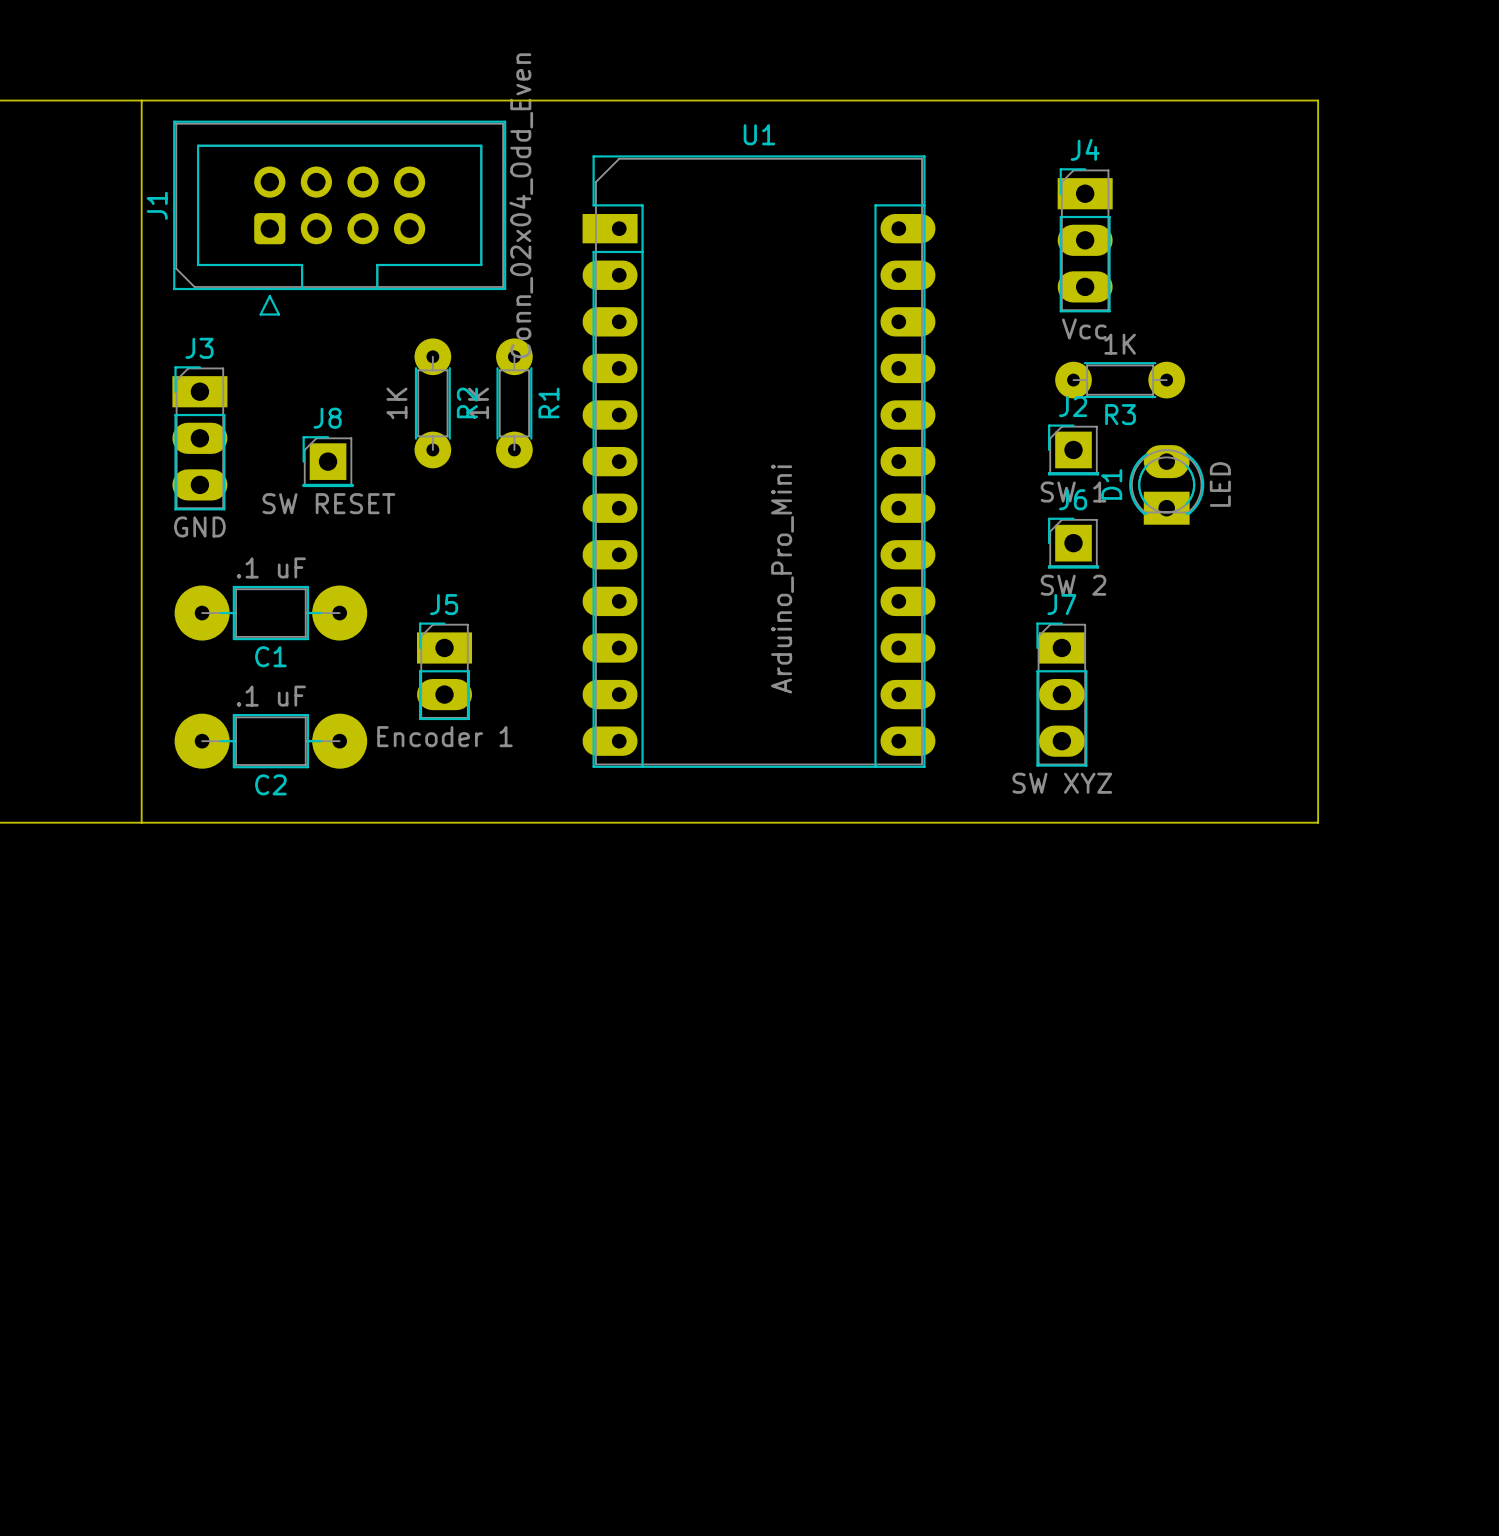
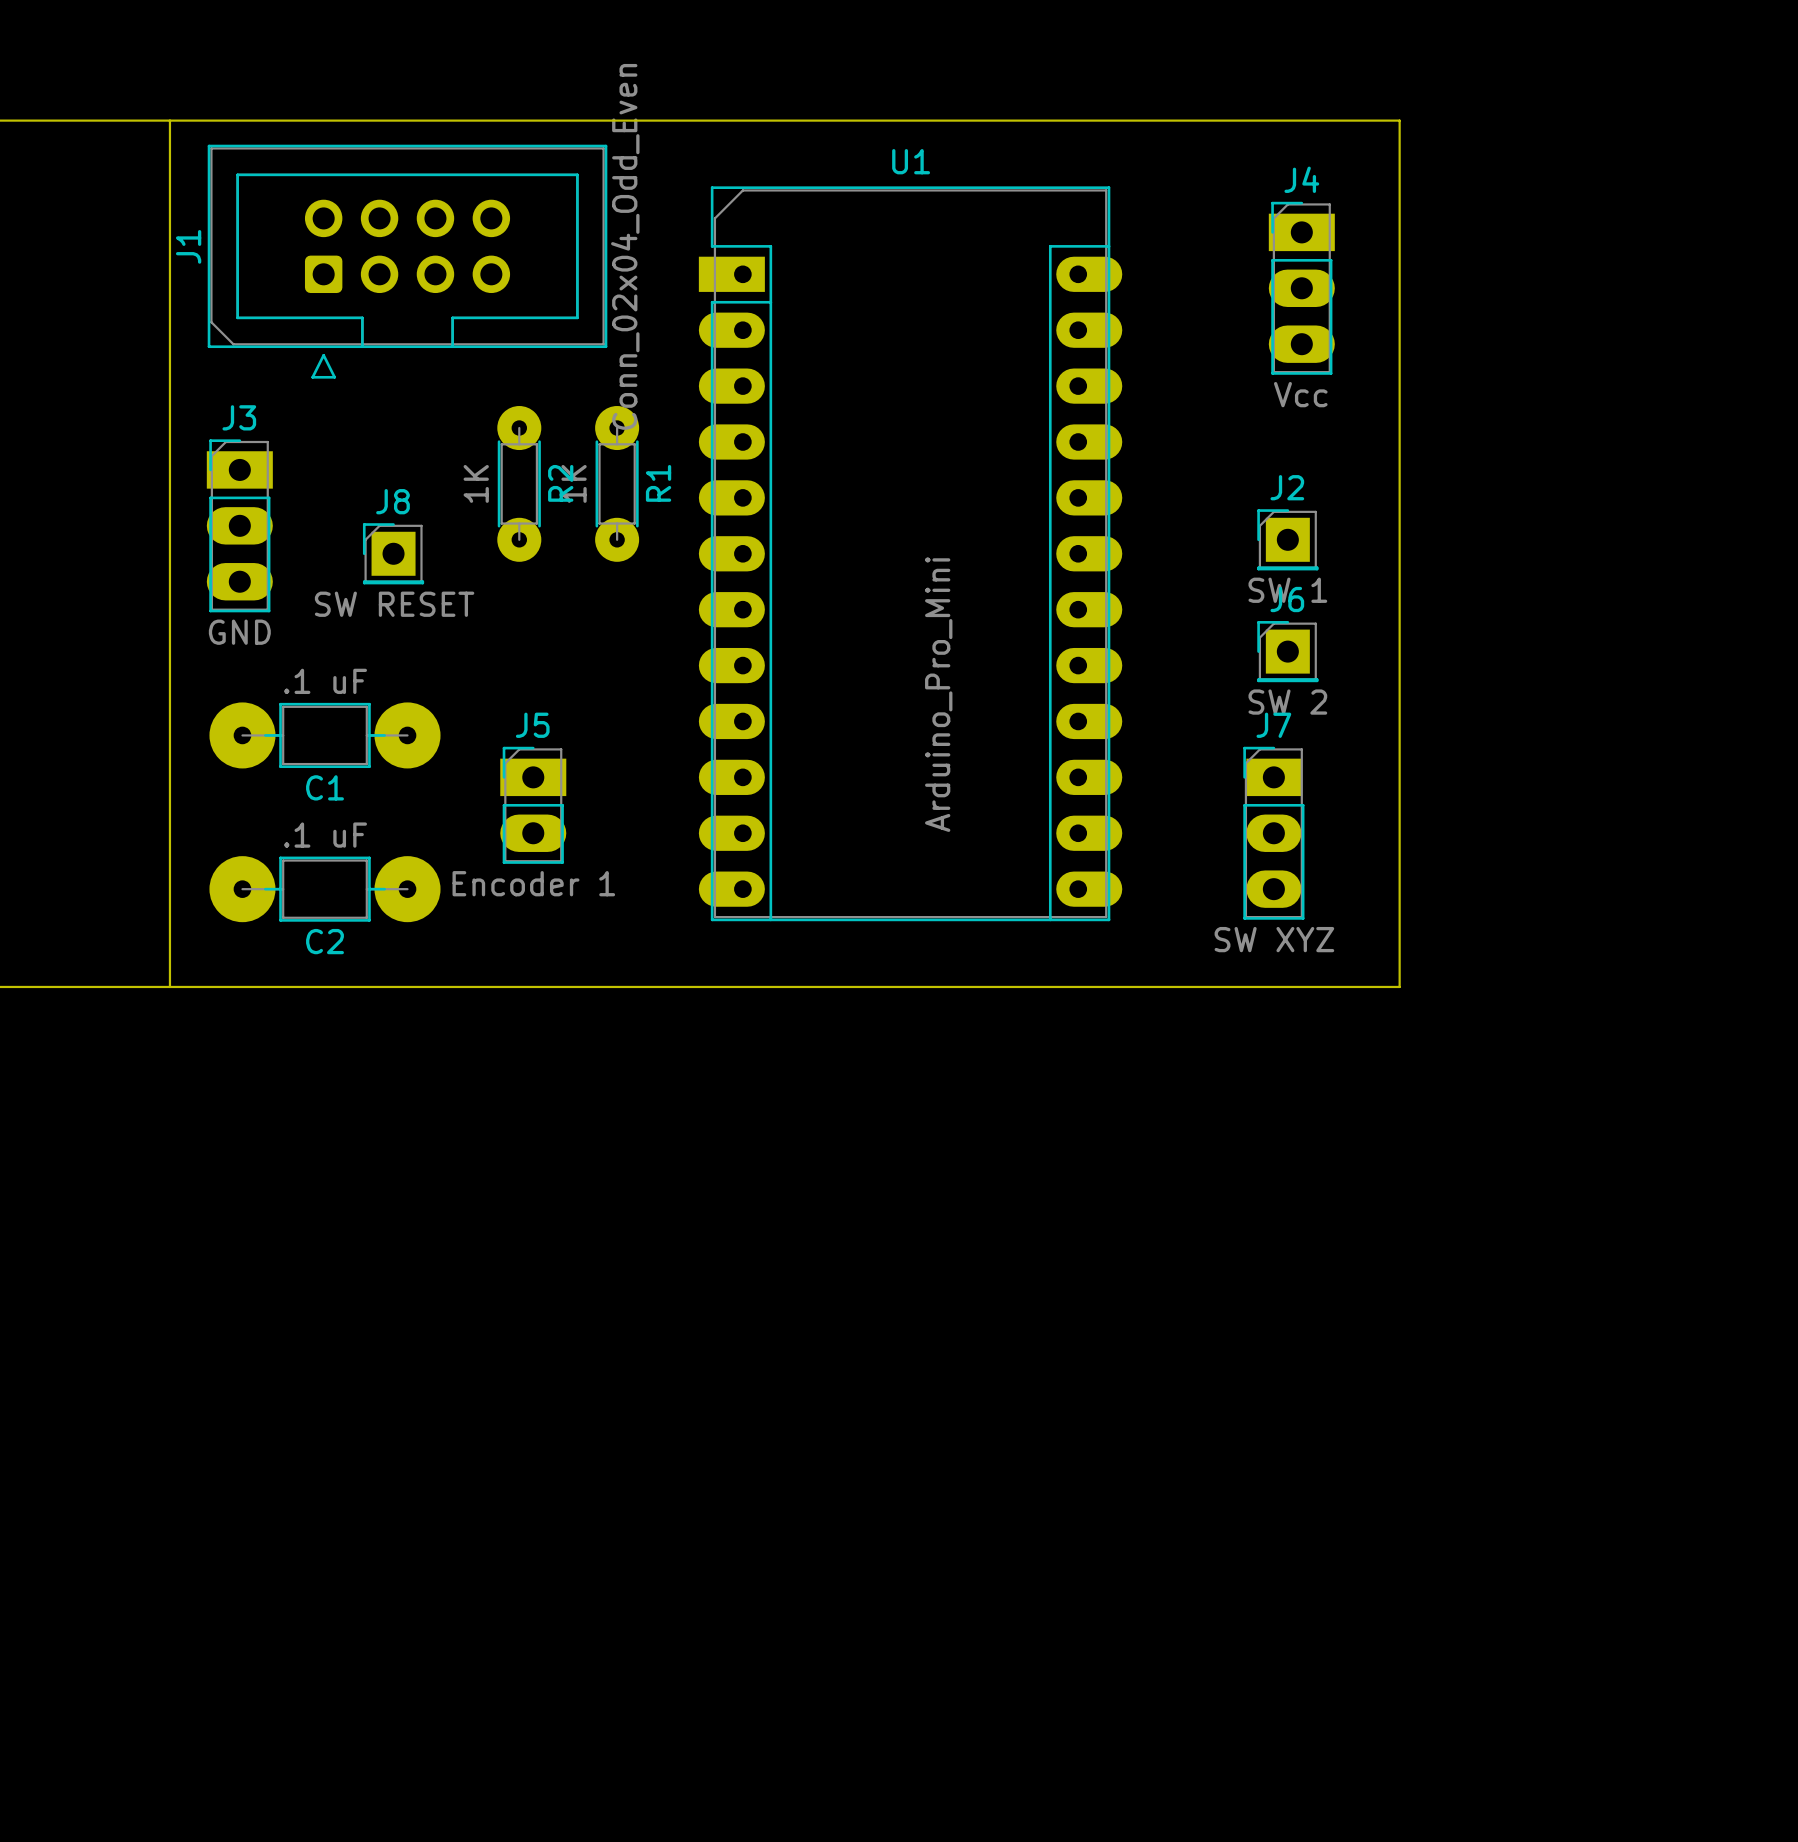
board edge: (1166, 100) (1318, 100) (1318, 822) (1166, 822) -> (1399, 120) (1399, 986)
R3: 1K (1120, 380) -> none
D1: LED (1166, 484) -> none

